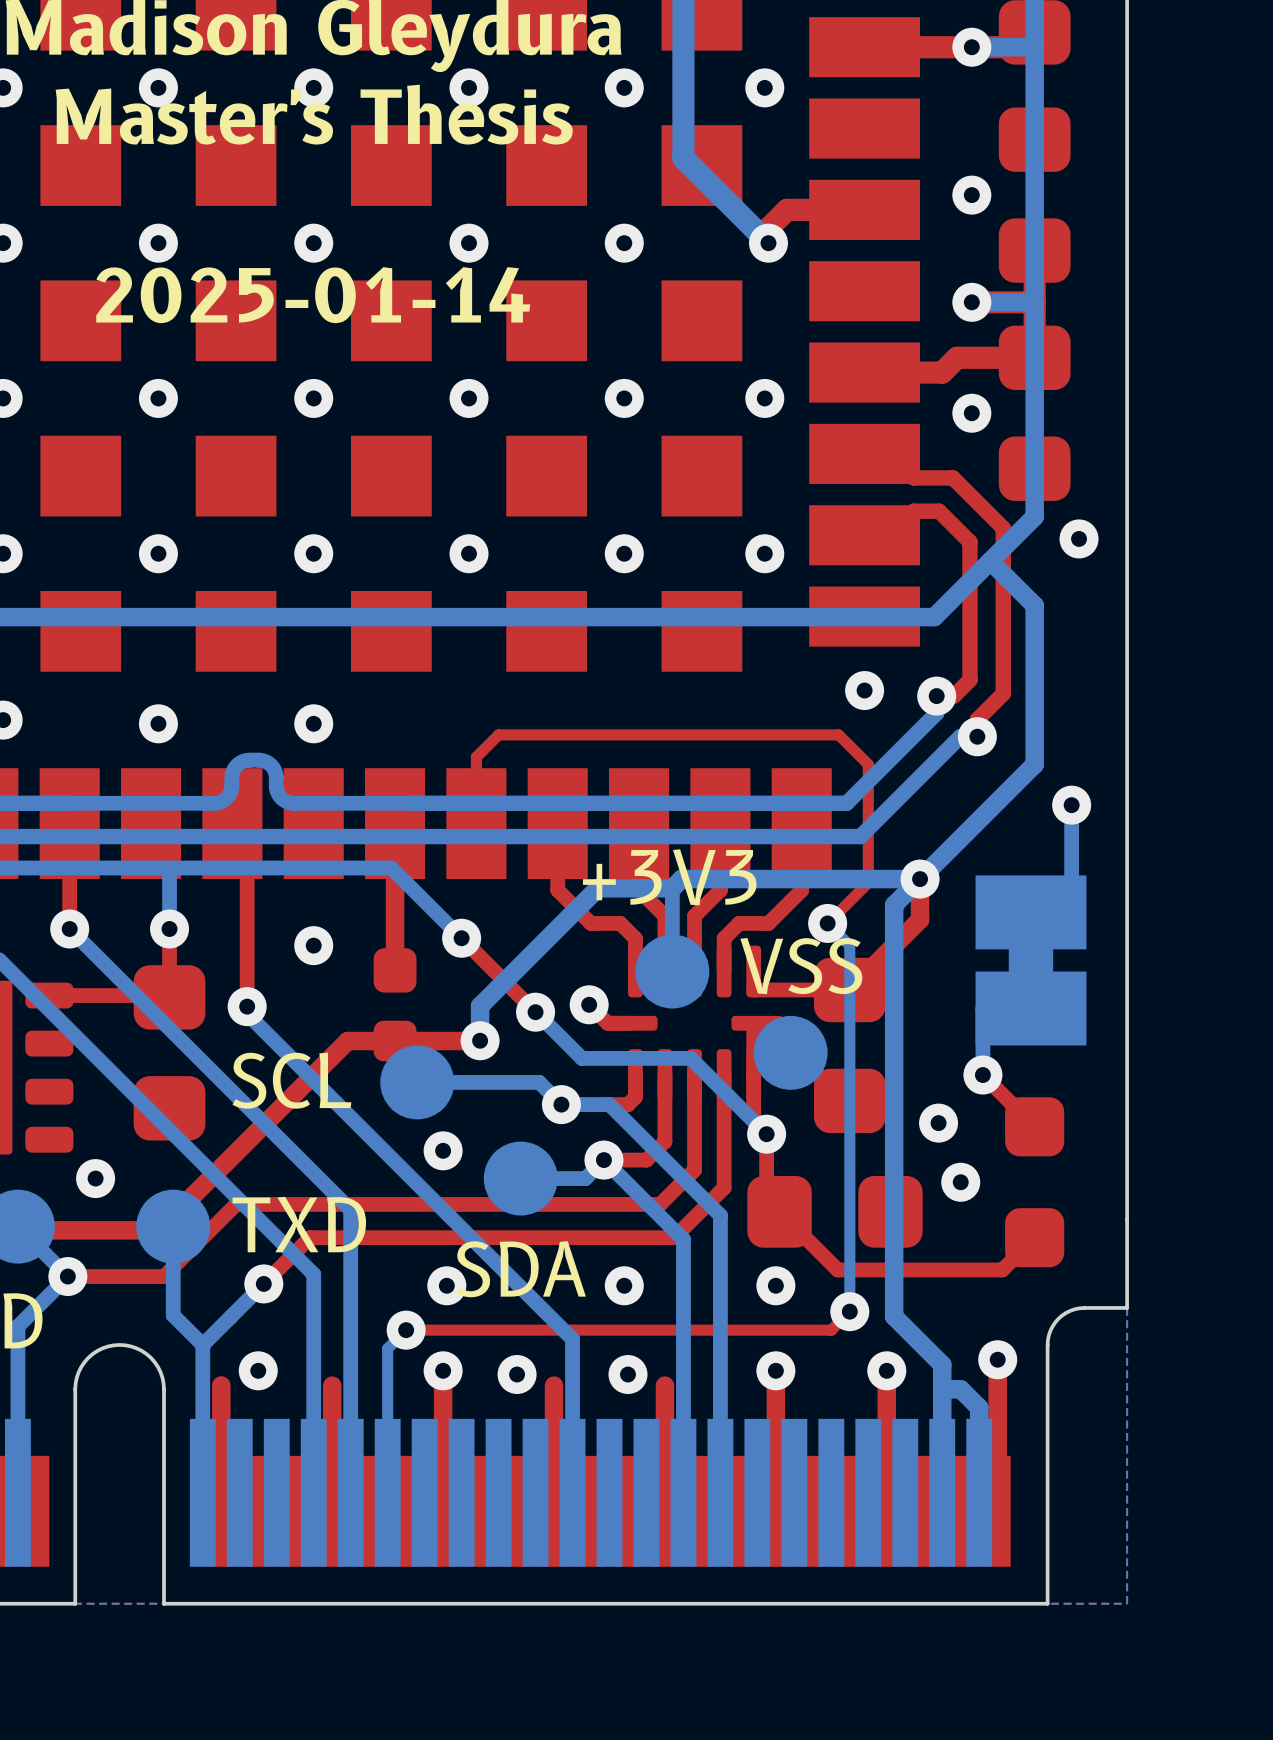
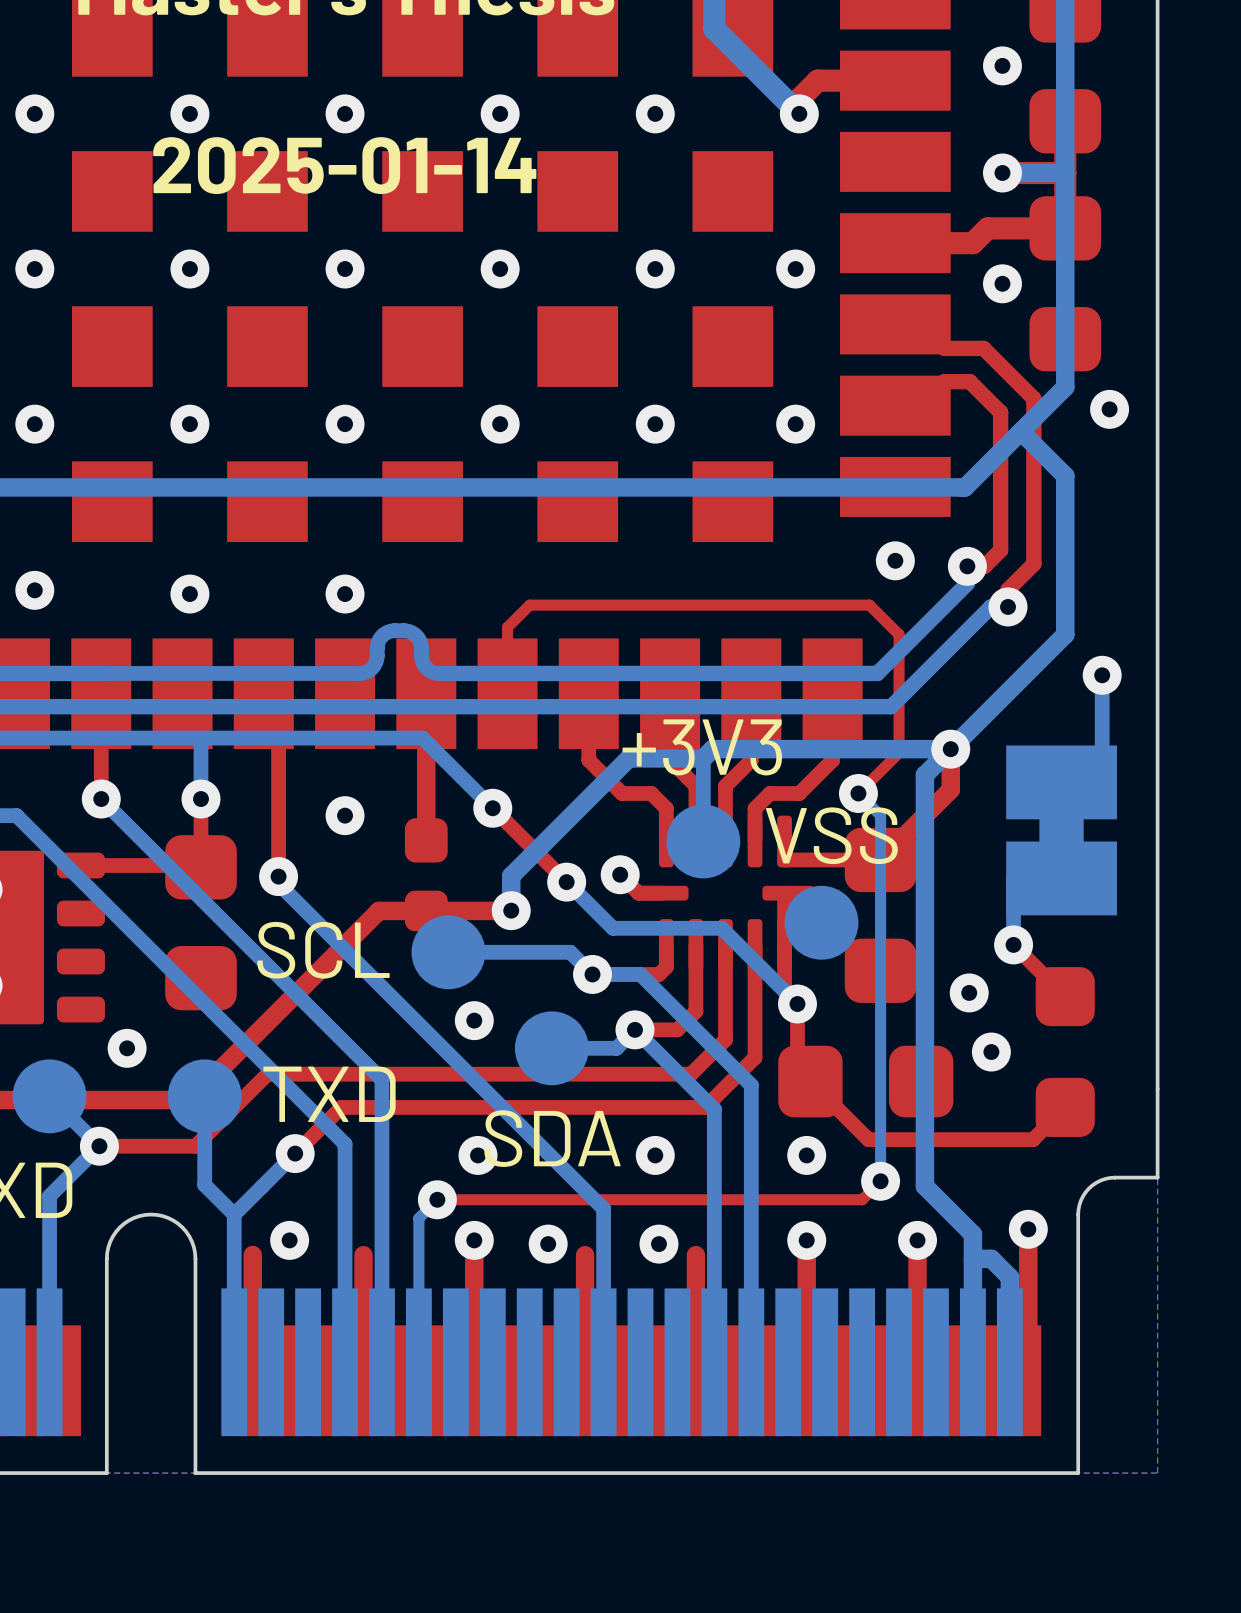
bottom track: (294, 803) (284, 800) (278, 794) (275, 773) (272, 766) (266, 761) (258, 760) (245, 760) (237, 765) (232, 773) (229, 794) (223, 800) (214, 803) -> (325, 673) (245, 673)
bottom track: (408, 803) (328, 803) -> (439, 673) (431, 671) (425, 666) (421, 659) (418, 638) (413, 633) (403, 630) (390, 631) (382, 635) (377, 644) (374, 665) (367, 671) (359, 673)

